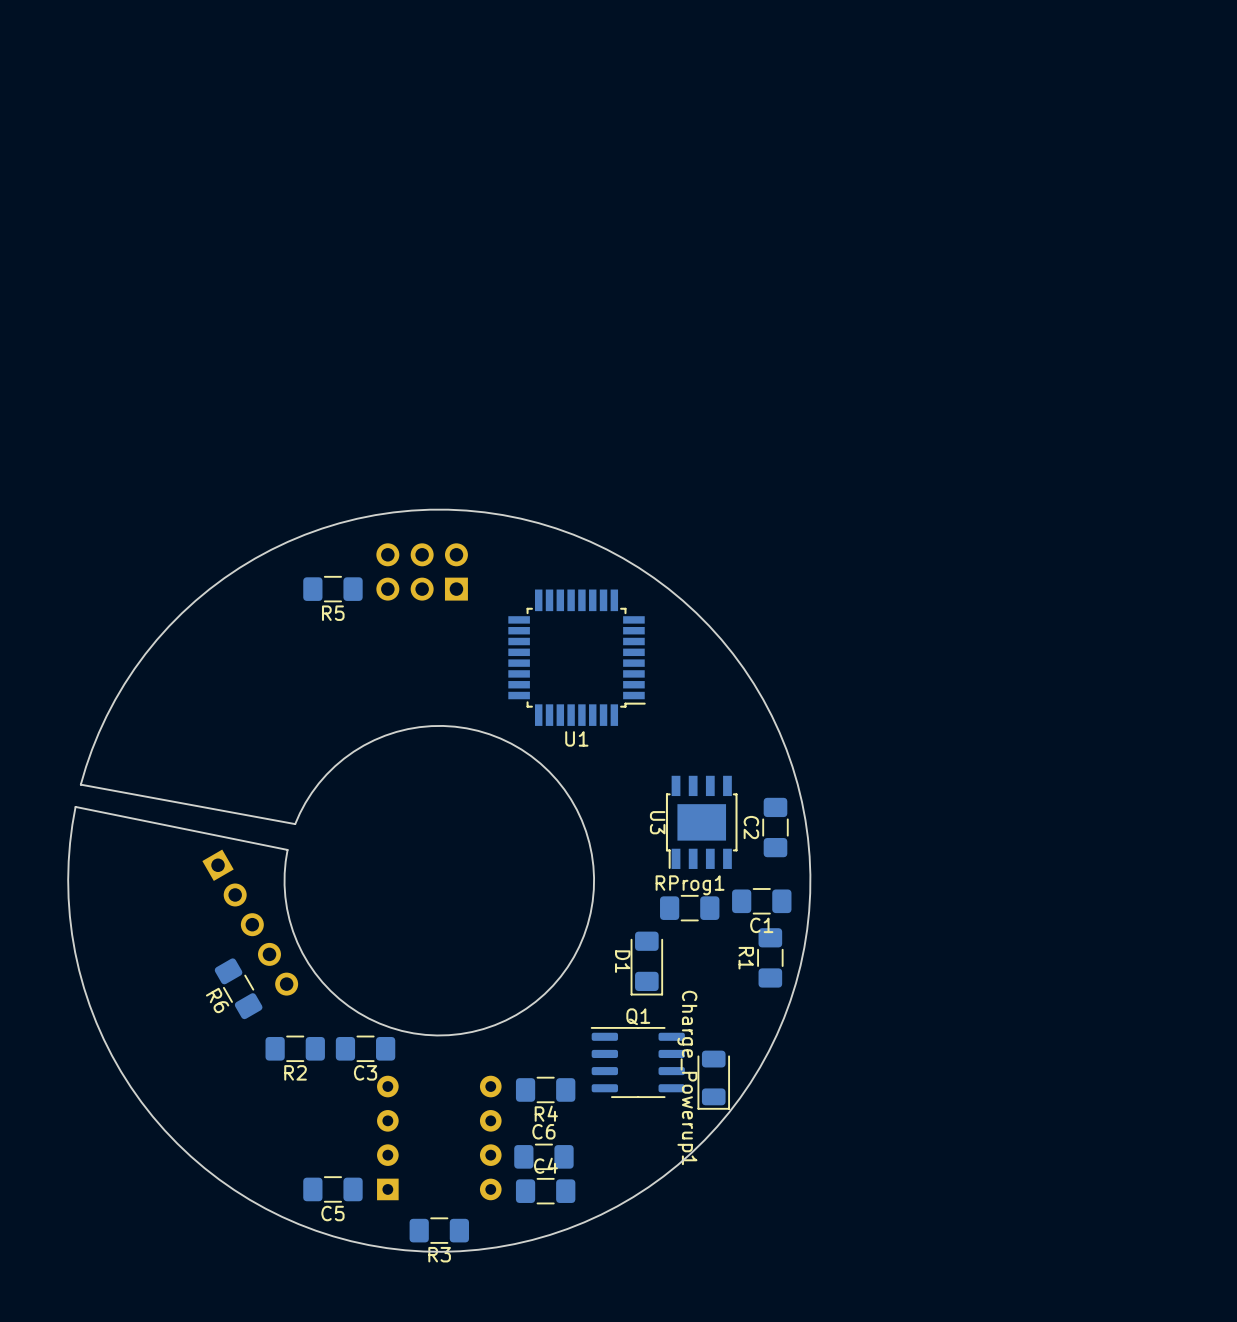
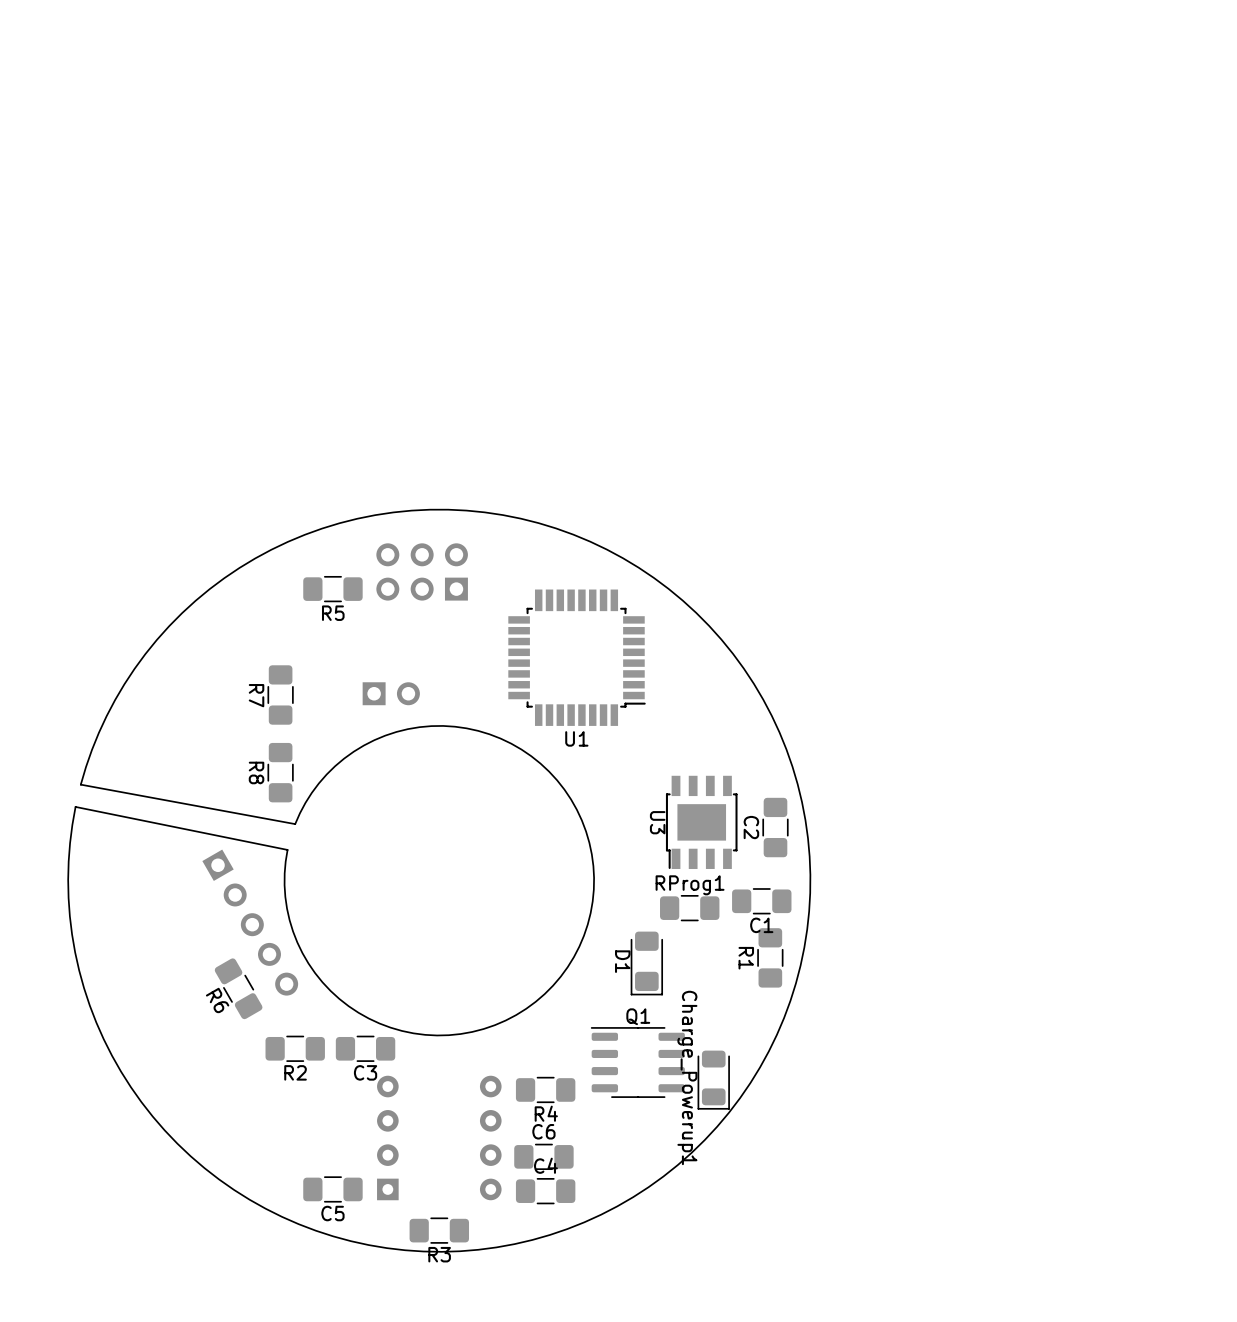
part: none -> (391, 693)
R7: none -> (280, 694)
R8: none -> (280, 772)

